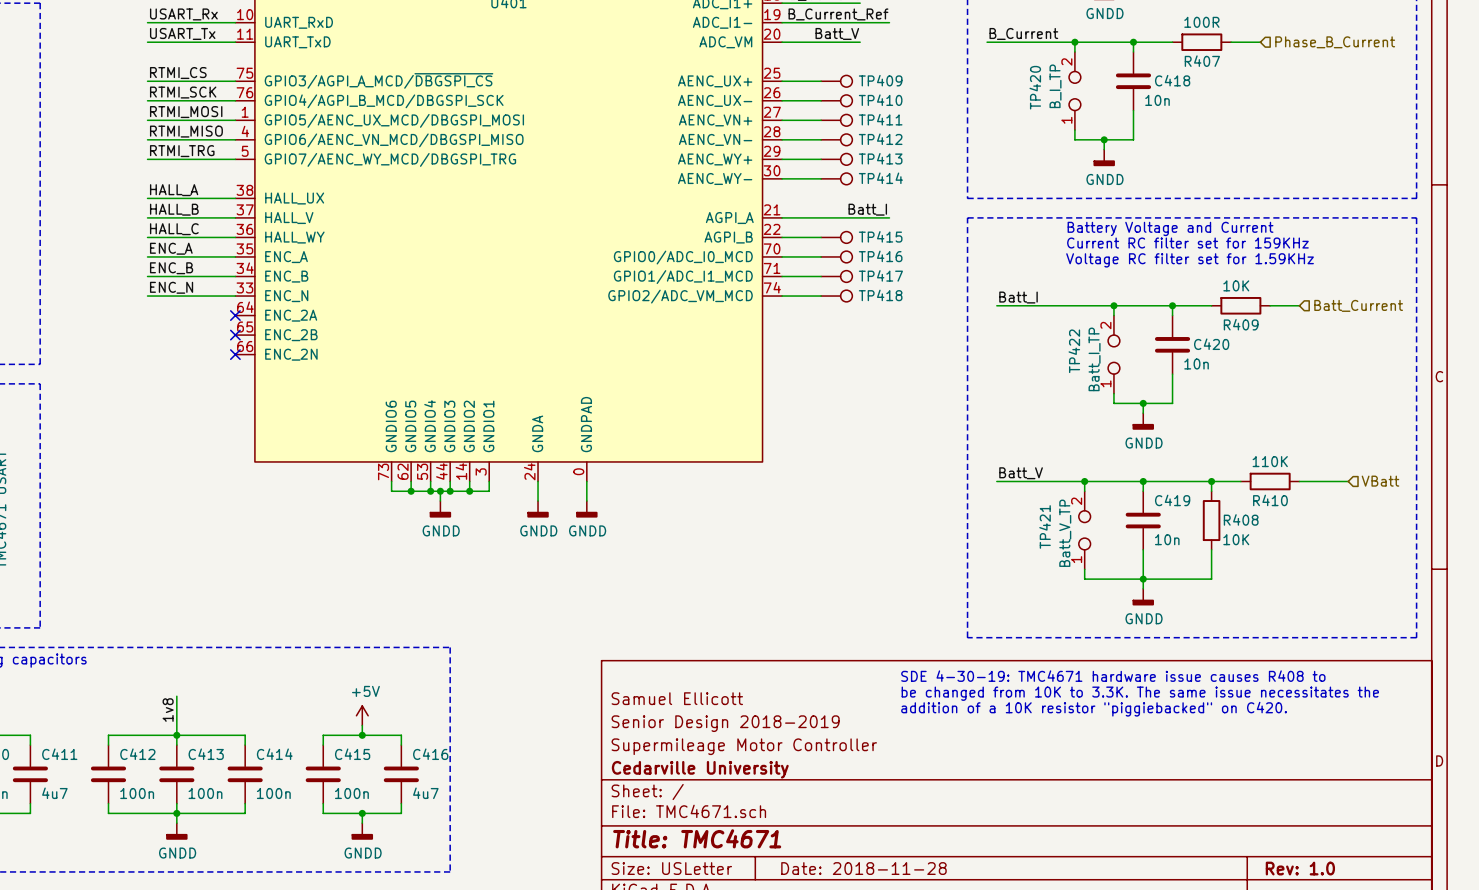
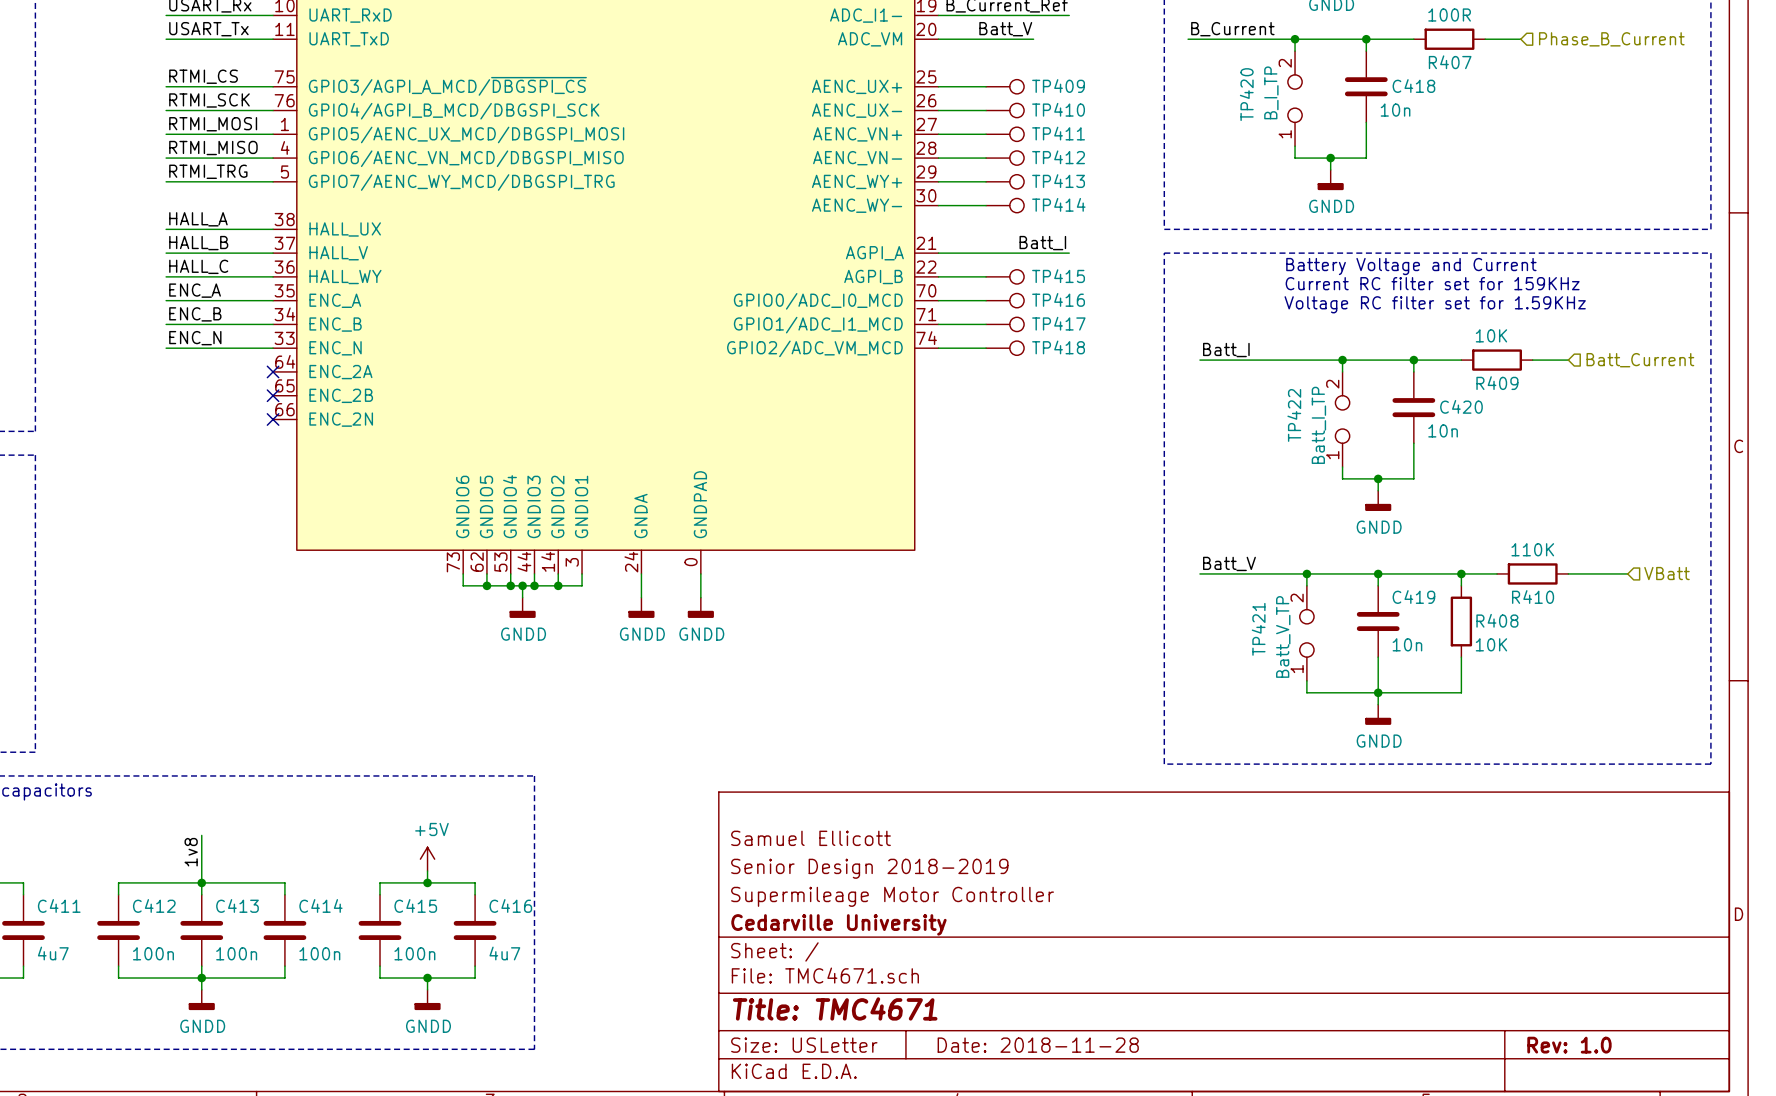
text: SDE 4-30-19: TMC4671 hardware issue causes R408 to (1113, 676) -> none
text: be changed from 10K to 3.3K. The same issue necessitates the (1140, 693) -> none
text: addition of a 10K resistor "piggiebacked" on C420. (1094, 709) -> none

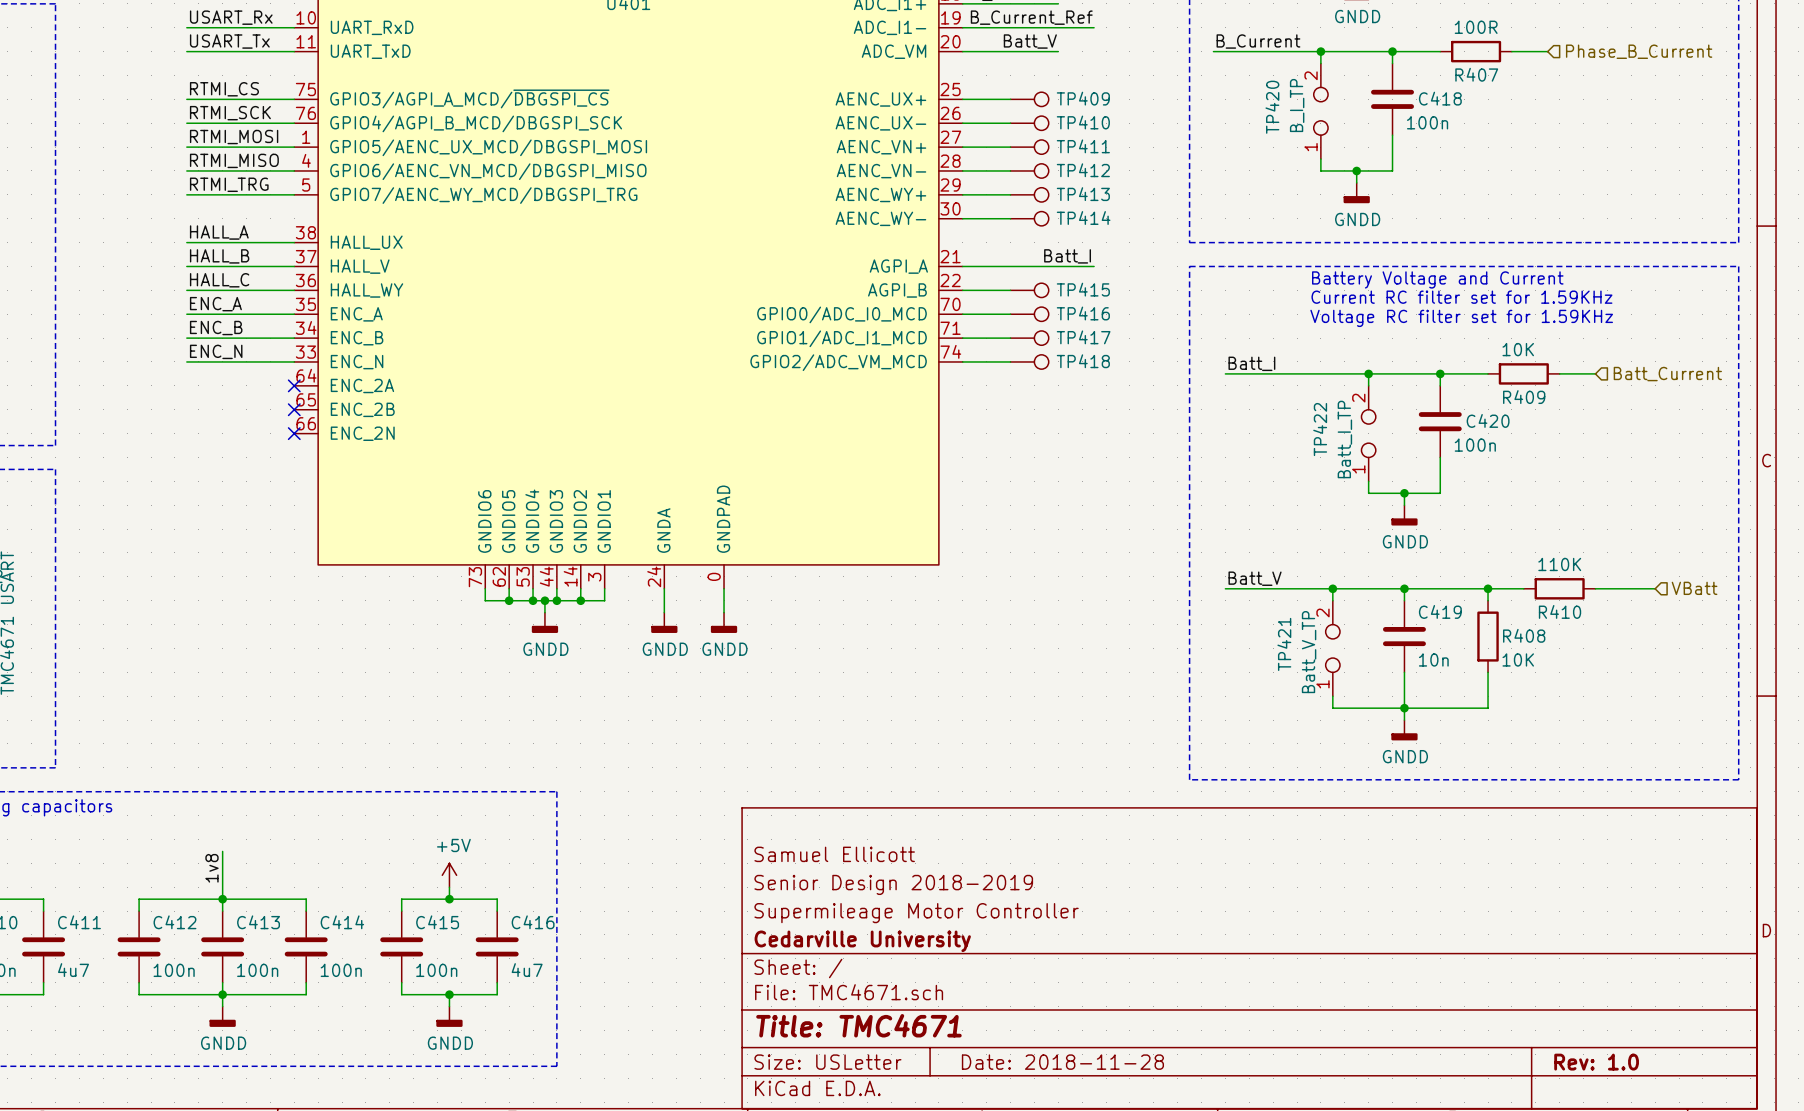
C418 value: 10n (1395, 110) -> 100n (1427, 122)
text: Current RC filter set for 159KHz (1432, 283) -> Current RC filter set for 1.59KHz (1461, 297)
C420 value: 10n (1443, 430) -> 100n (1475, 445)

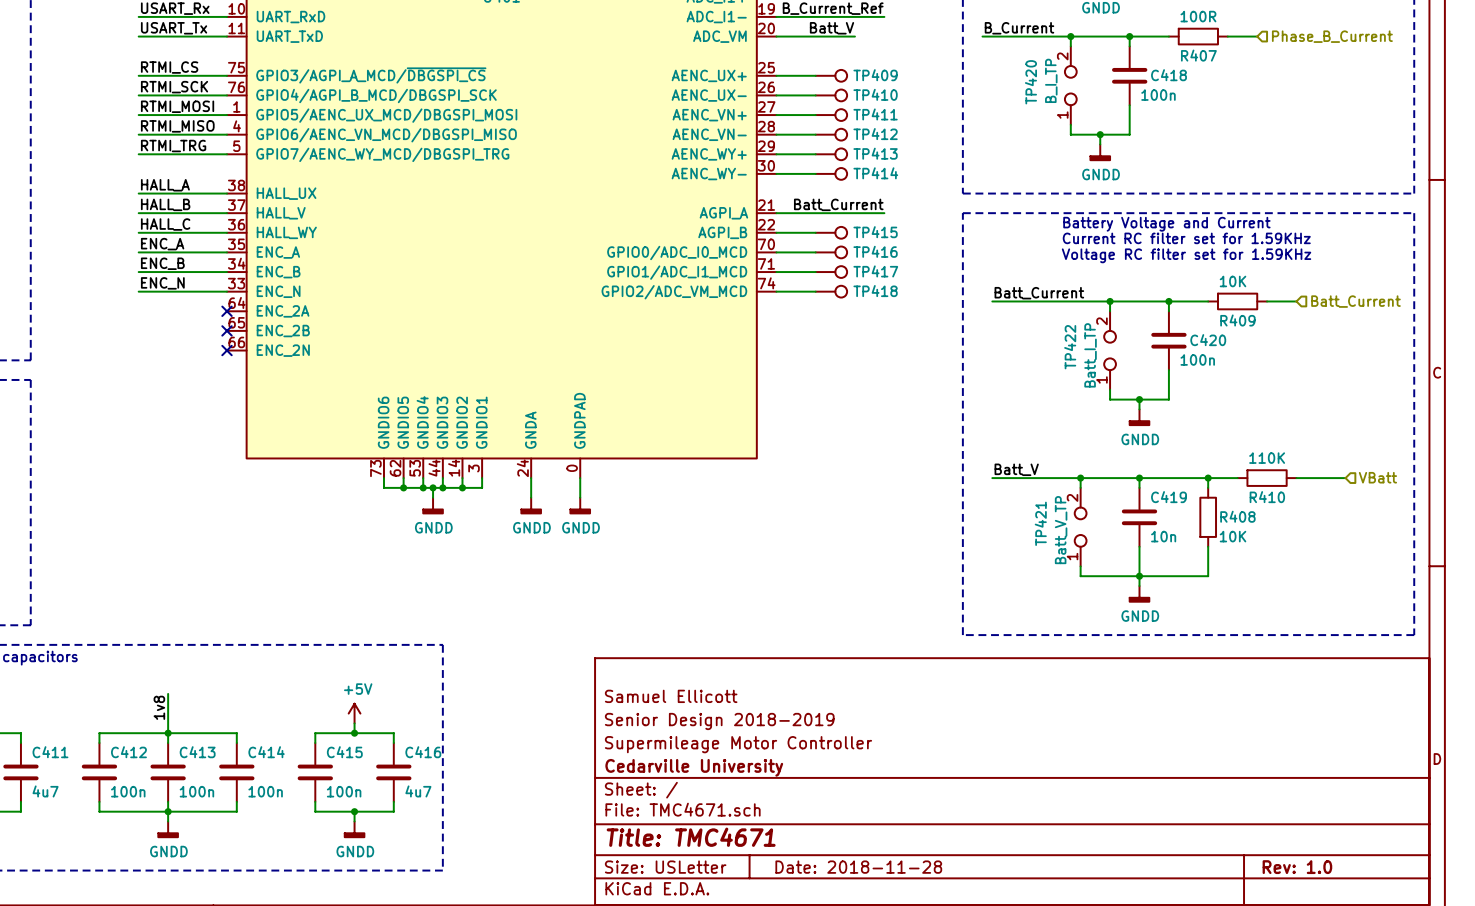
label: Batt_I (1067, 256) -> Batt_Current (838, 204)
label: Batt_I (1251, 363) -> Batt_Current (1039, 293)

